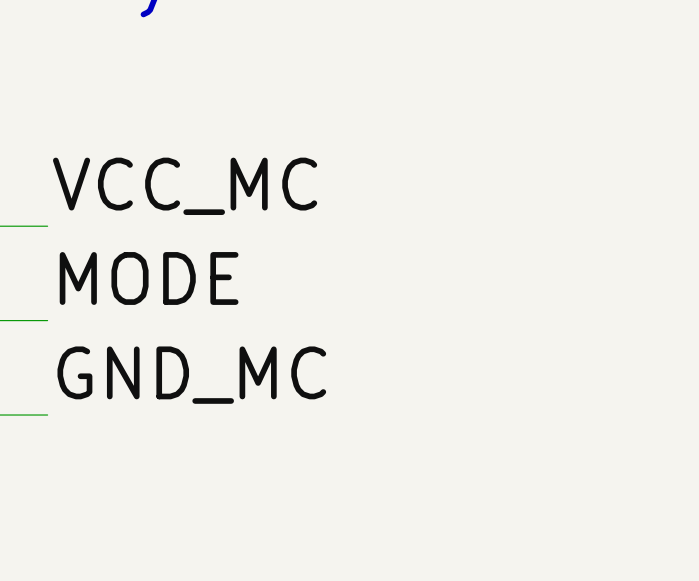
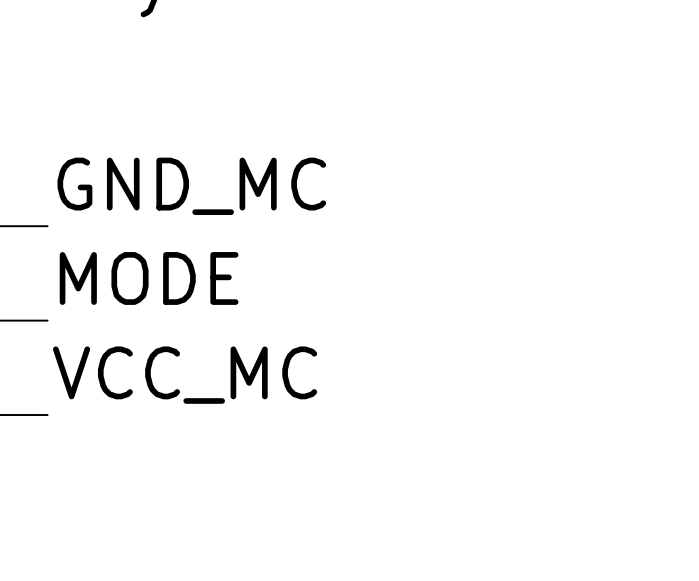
label: VCC_MC (185, 186) -> GND_MC (191, 186)
label: GND_MC (191, 375) -> VCC_MC (185, 375)

